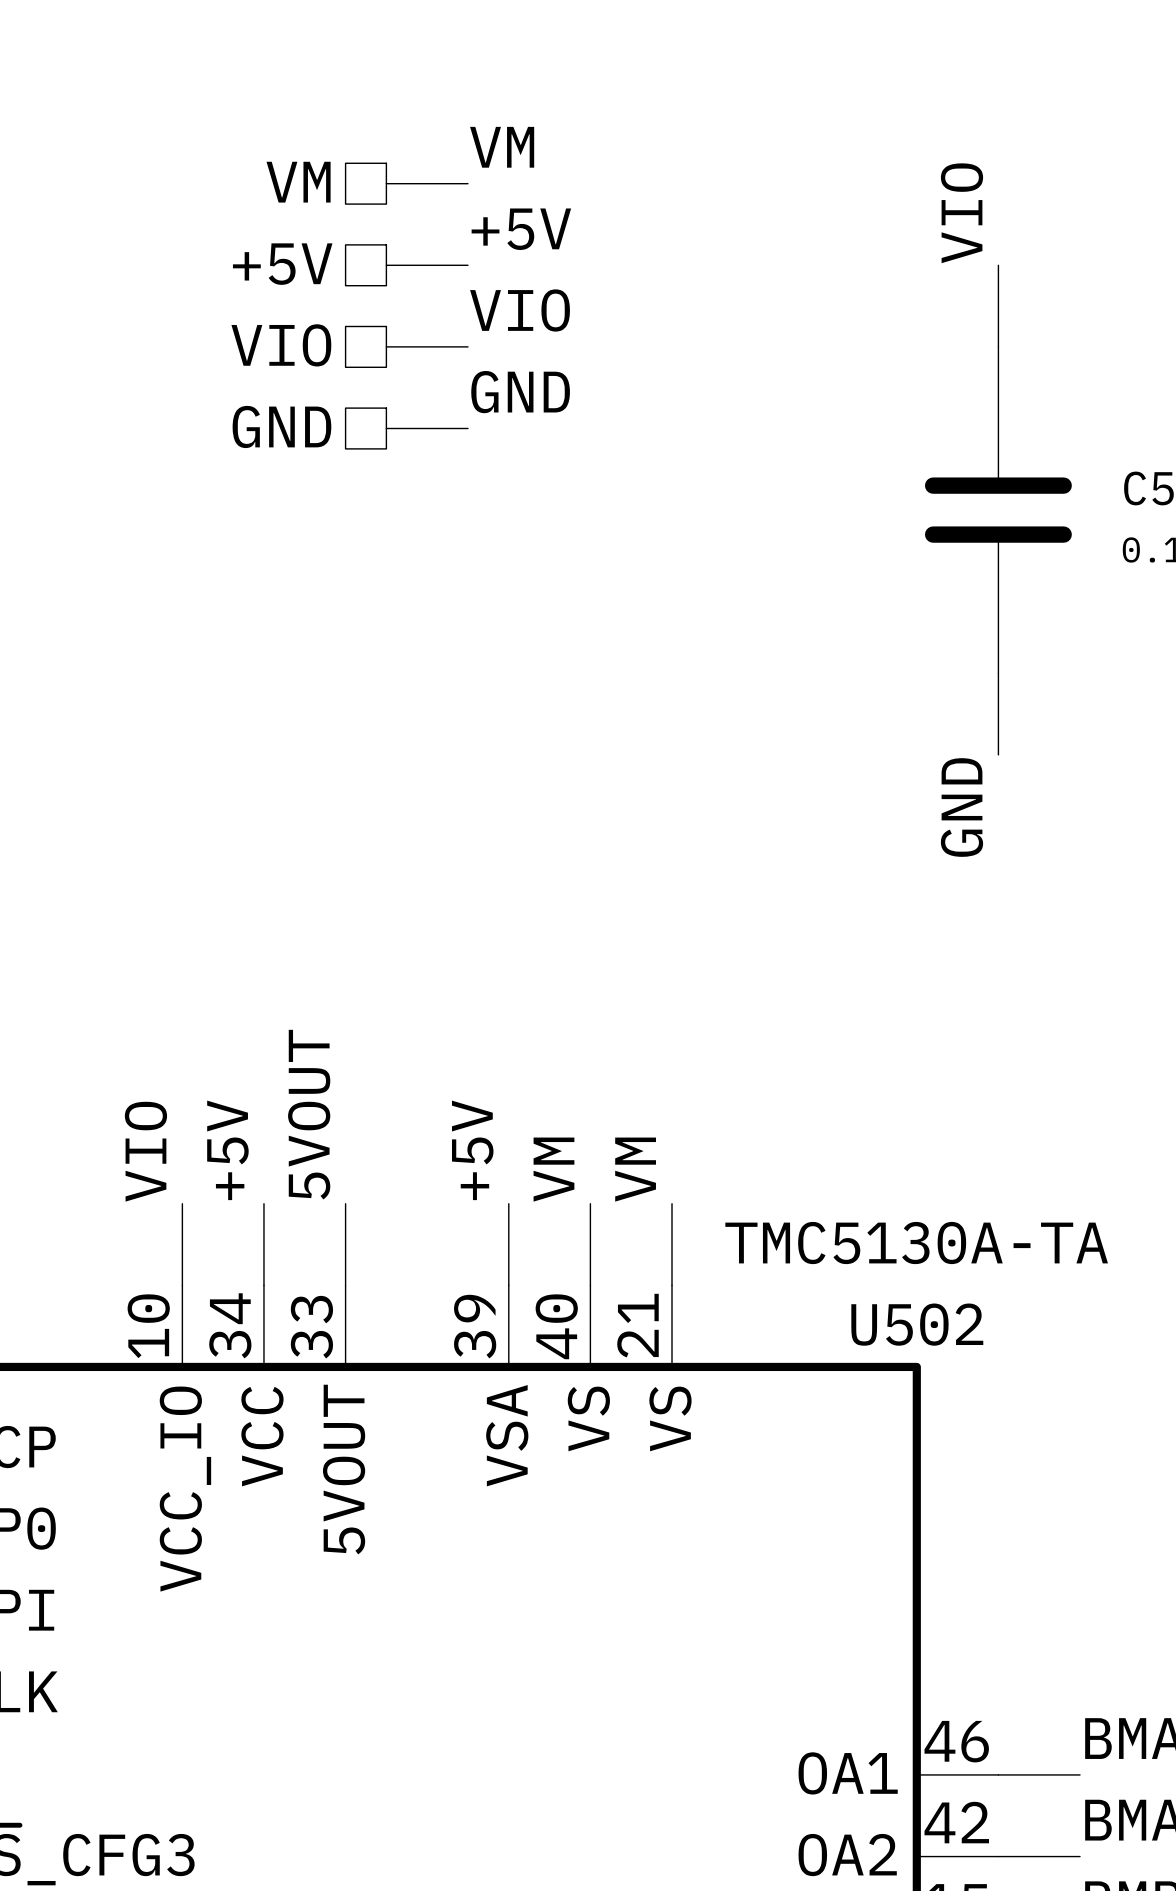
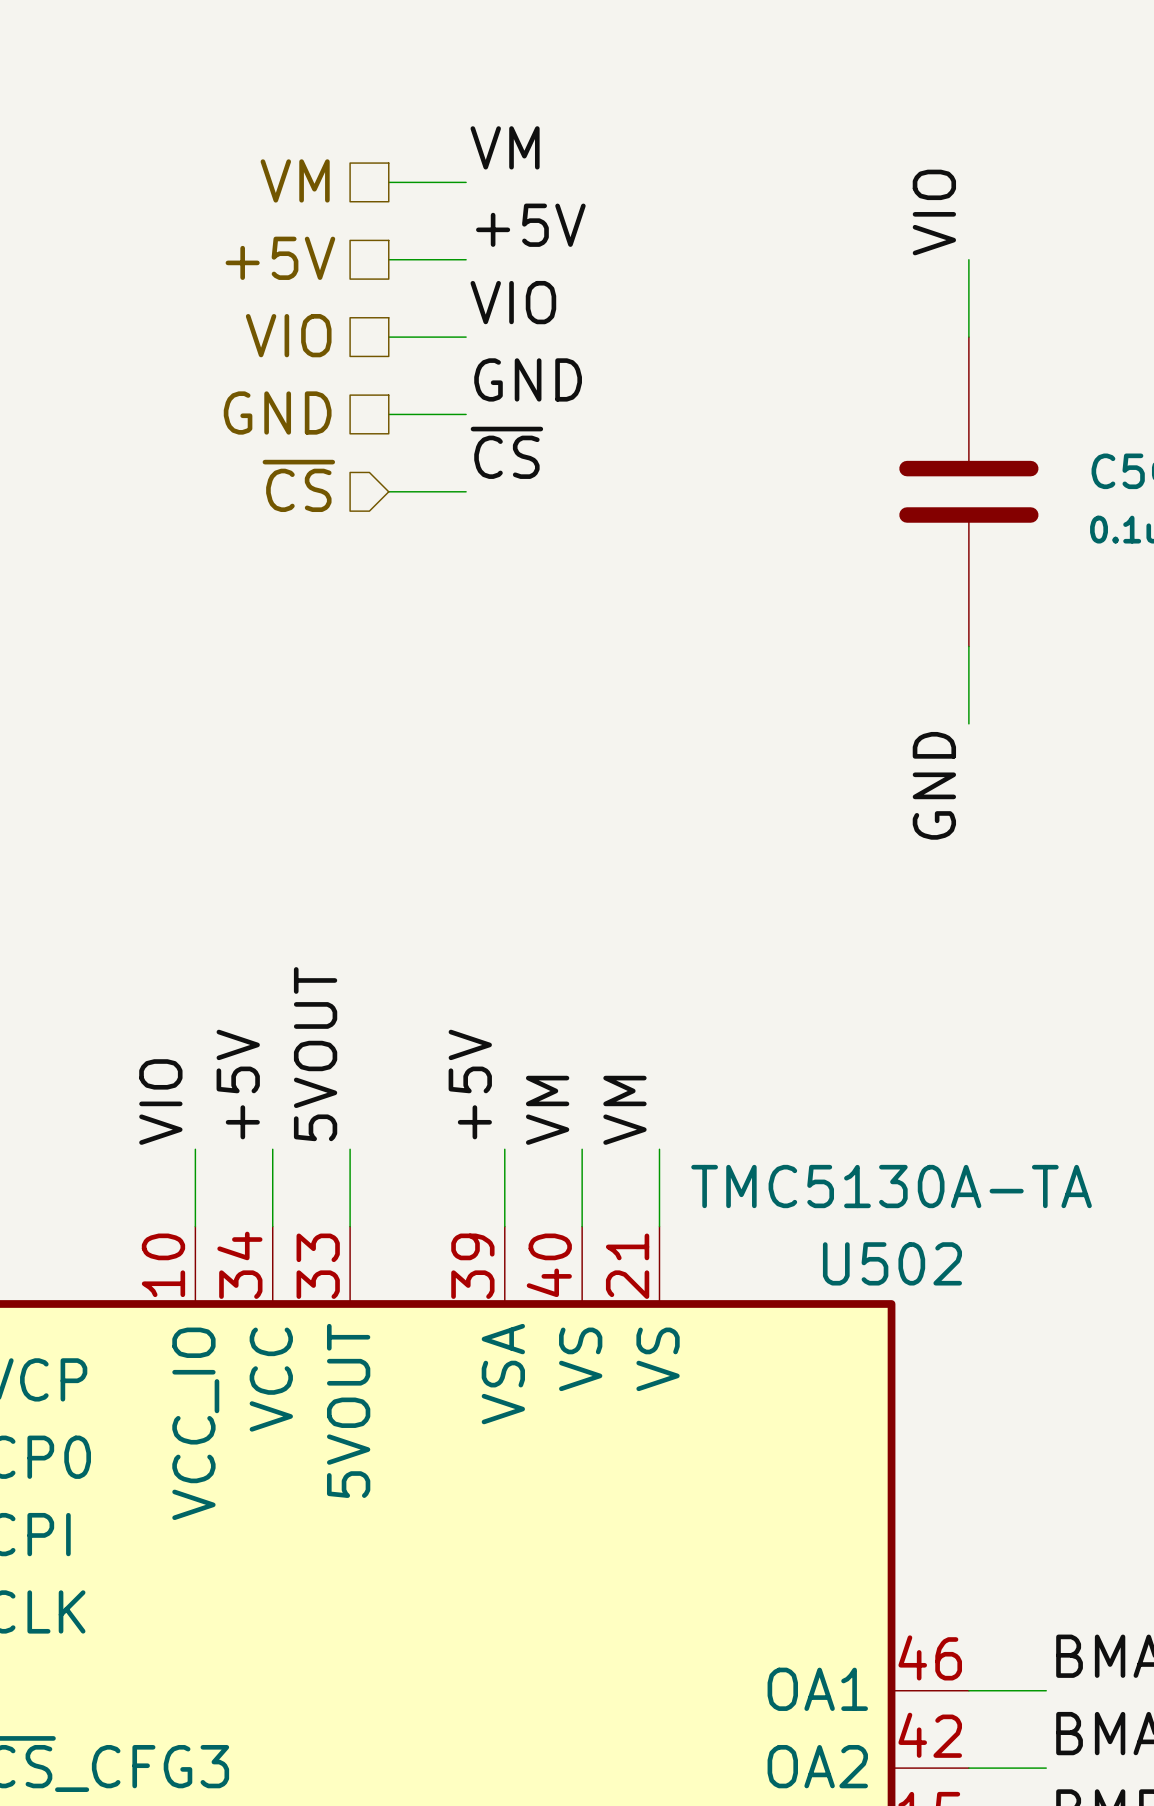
label: none -> ~{CS} (506, 452)
hierarchical label: none -> ~{CS} (298, 485)
wire: none -> (388, 491) (466, 491)

